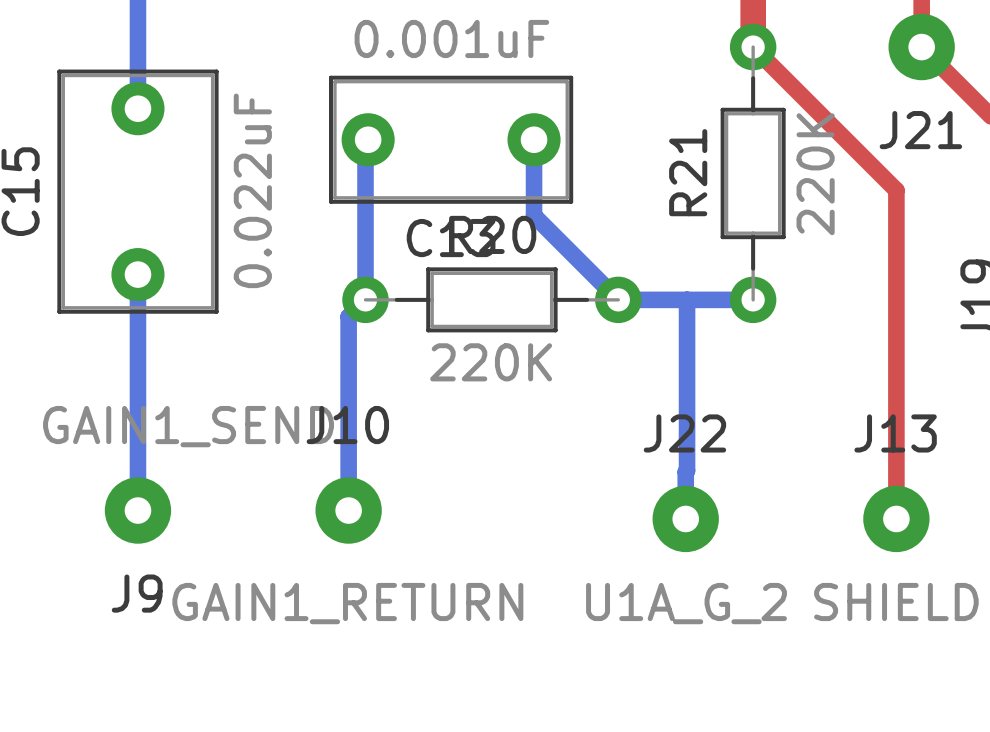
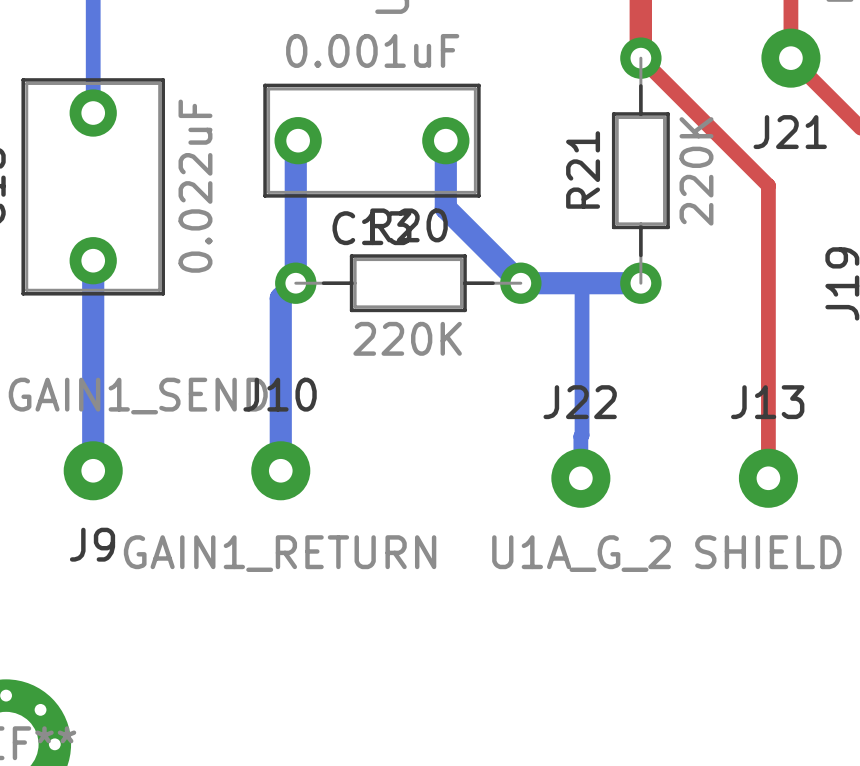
bottom track width: thin (368, 139) (365, 142) (365, 299) (348, 316) (348, 510) -> thick (298, 140) (295, 143) (295, 283) (280, 298) (280, 470)
bottom track width: thin (534, 139) (534, 215) (618, 299) (753, 299) -> thick (445, 140) (445, 208) (520, 283) (640, 283)
bottom track width: thin (137, 274) (137, 510) -> thick (93, 260) (93, 470)

